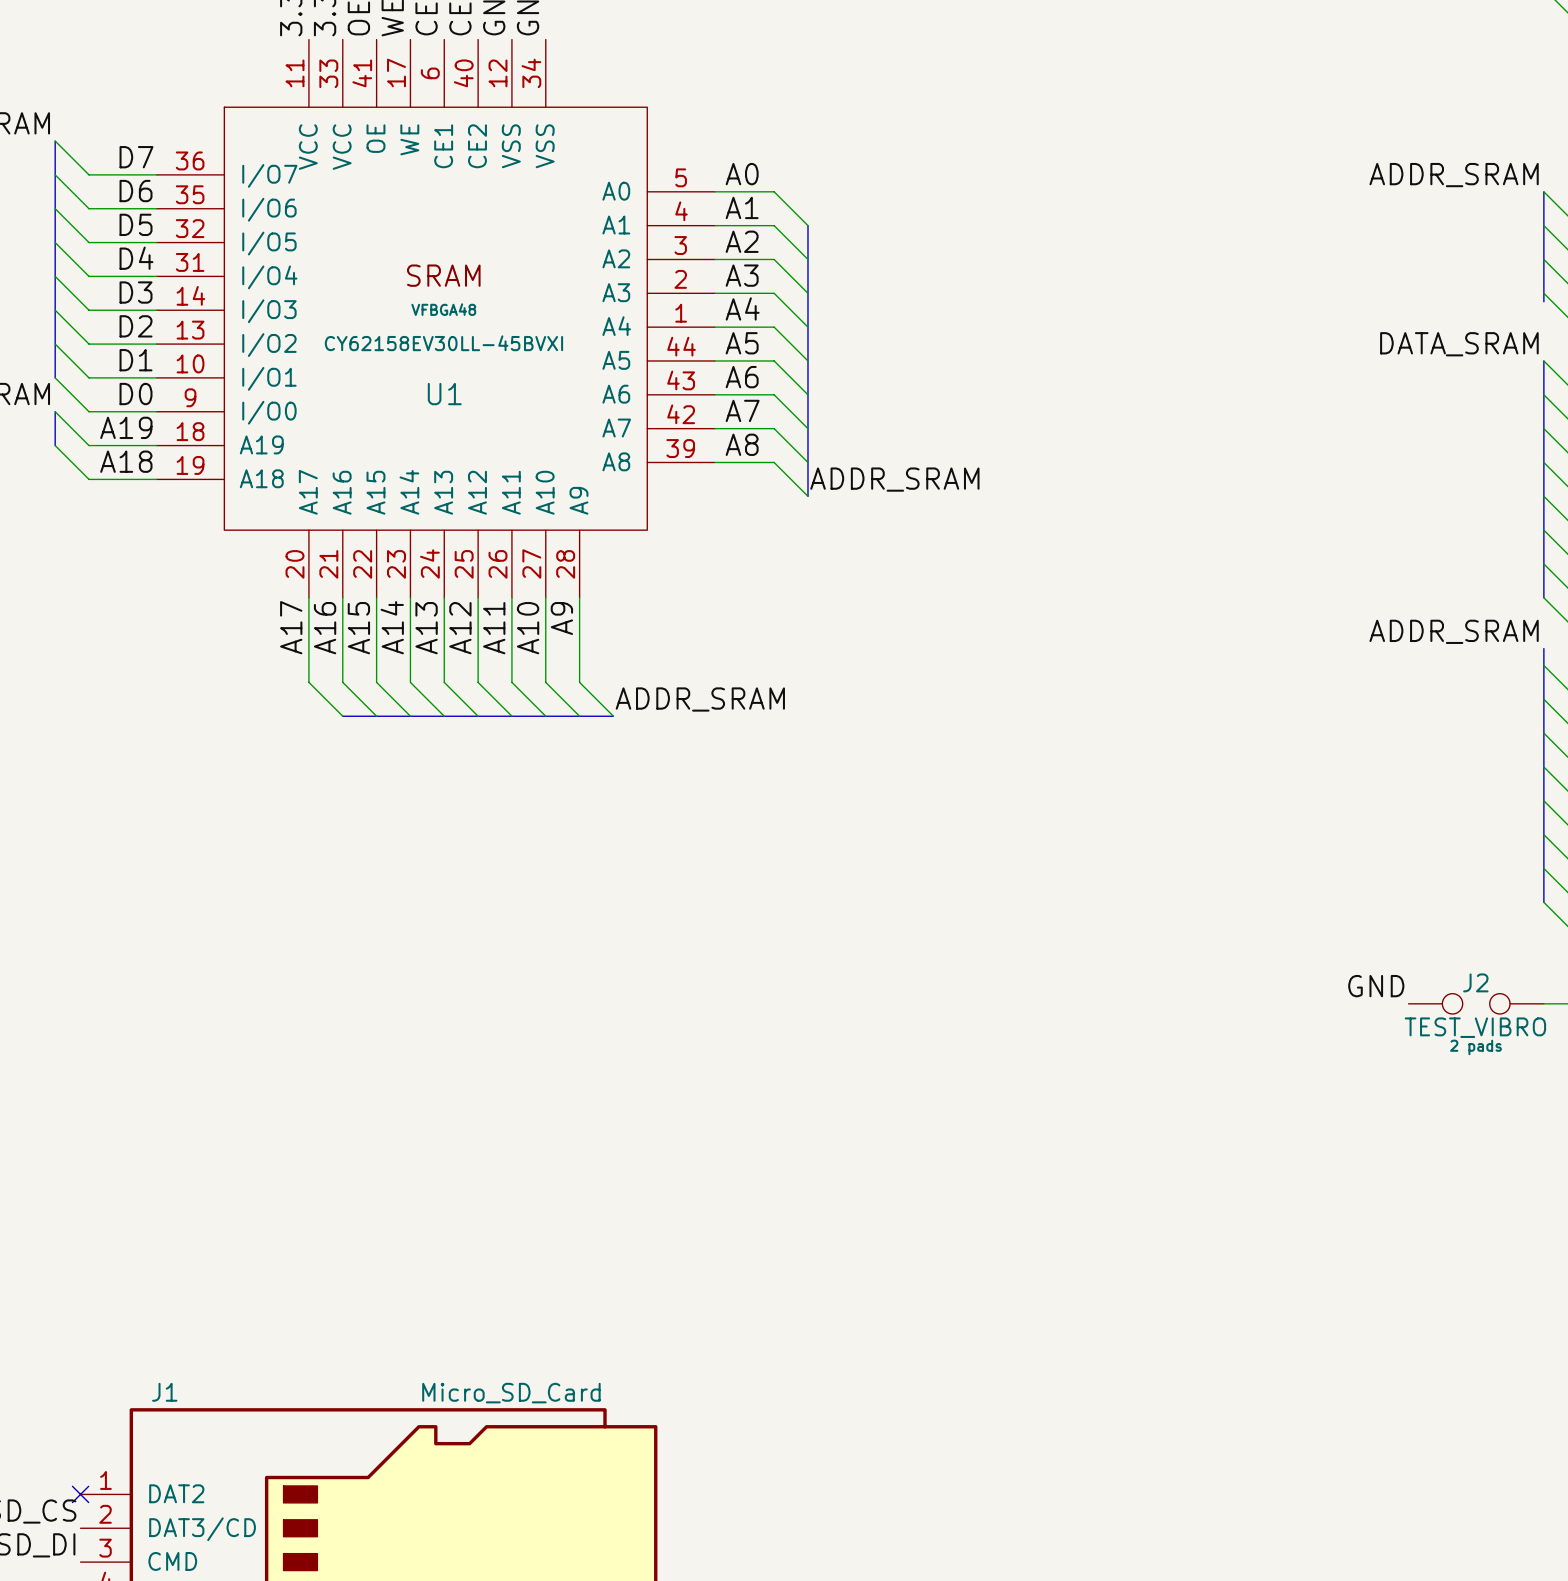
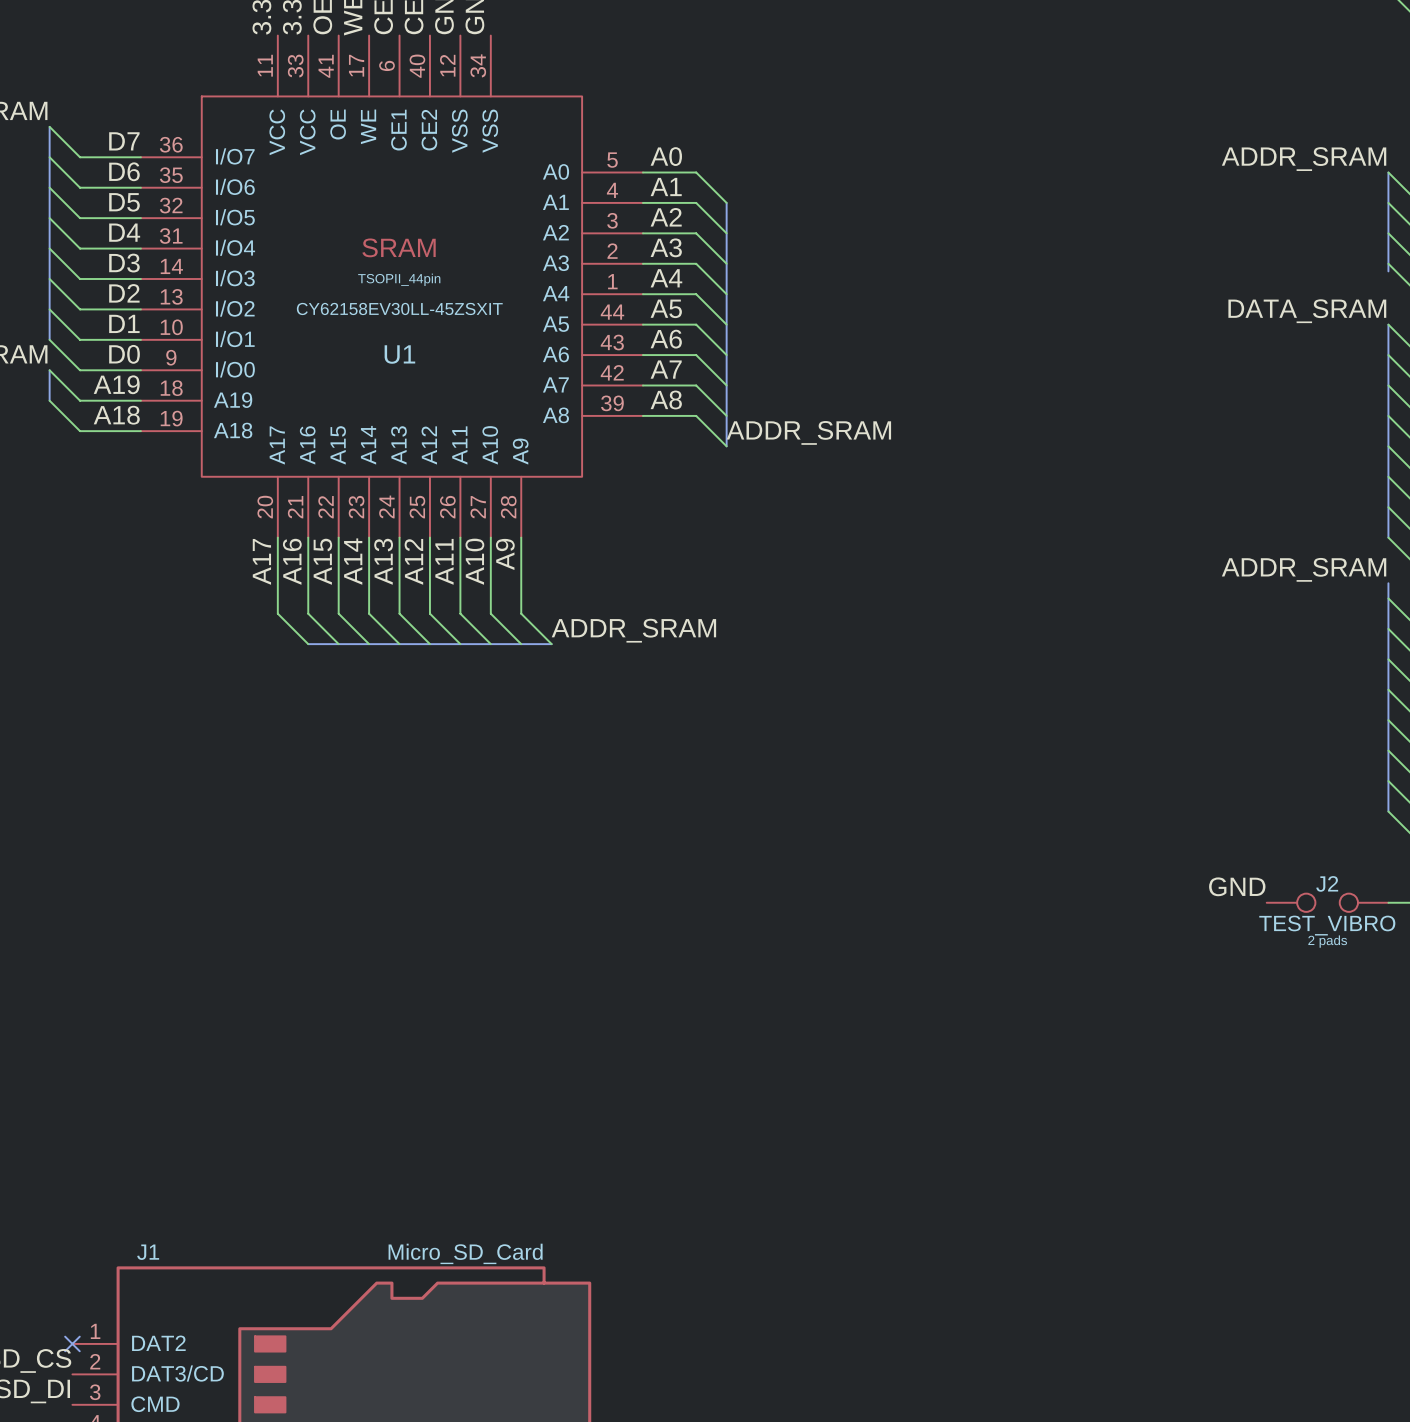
U1 text: VFBGA48 (443, 309) -> TSOPII_44pin (399, 279)
U1 value: CY62158EV30LL-45BVXI (443, 343) -> CY62158EV30LL-45ZSXIT (399, 308)

